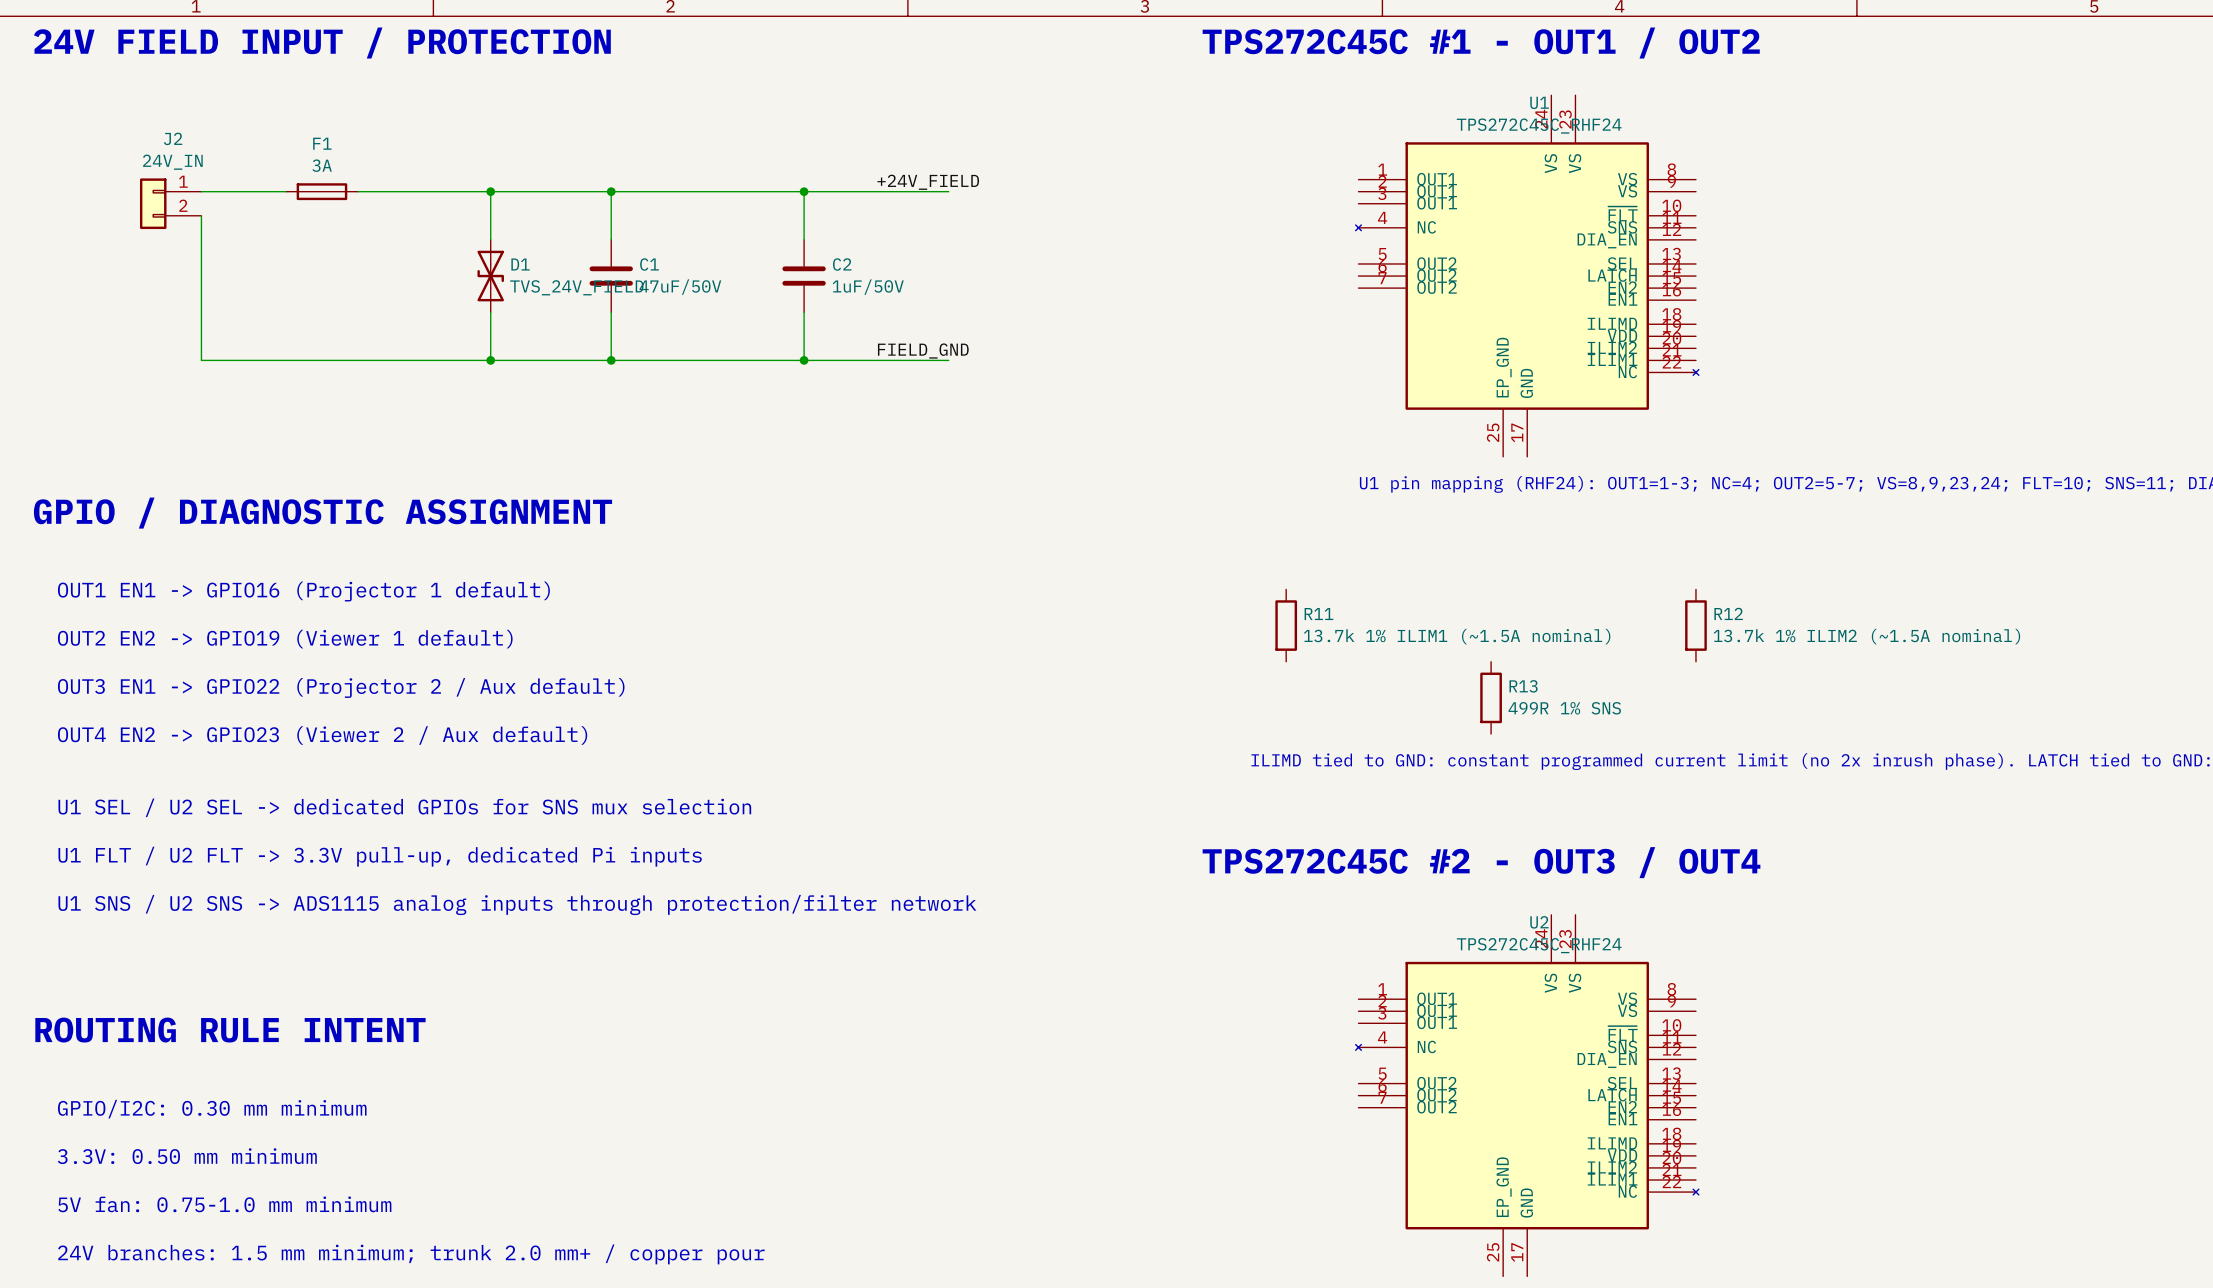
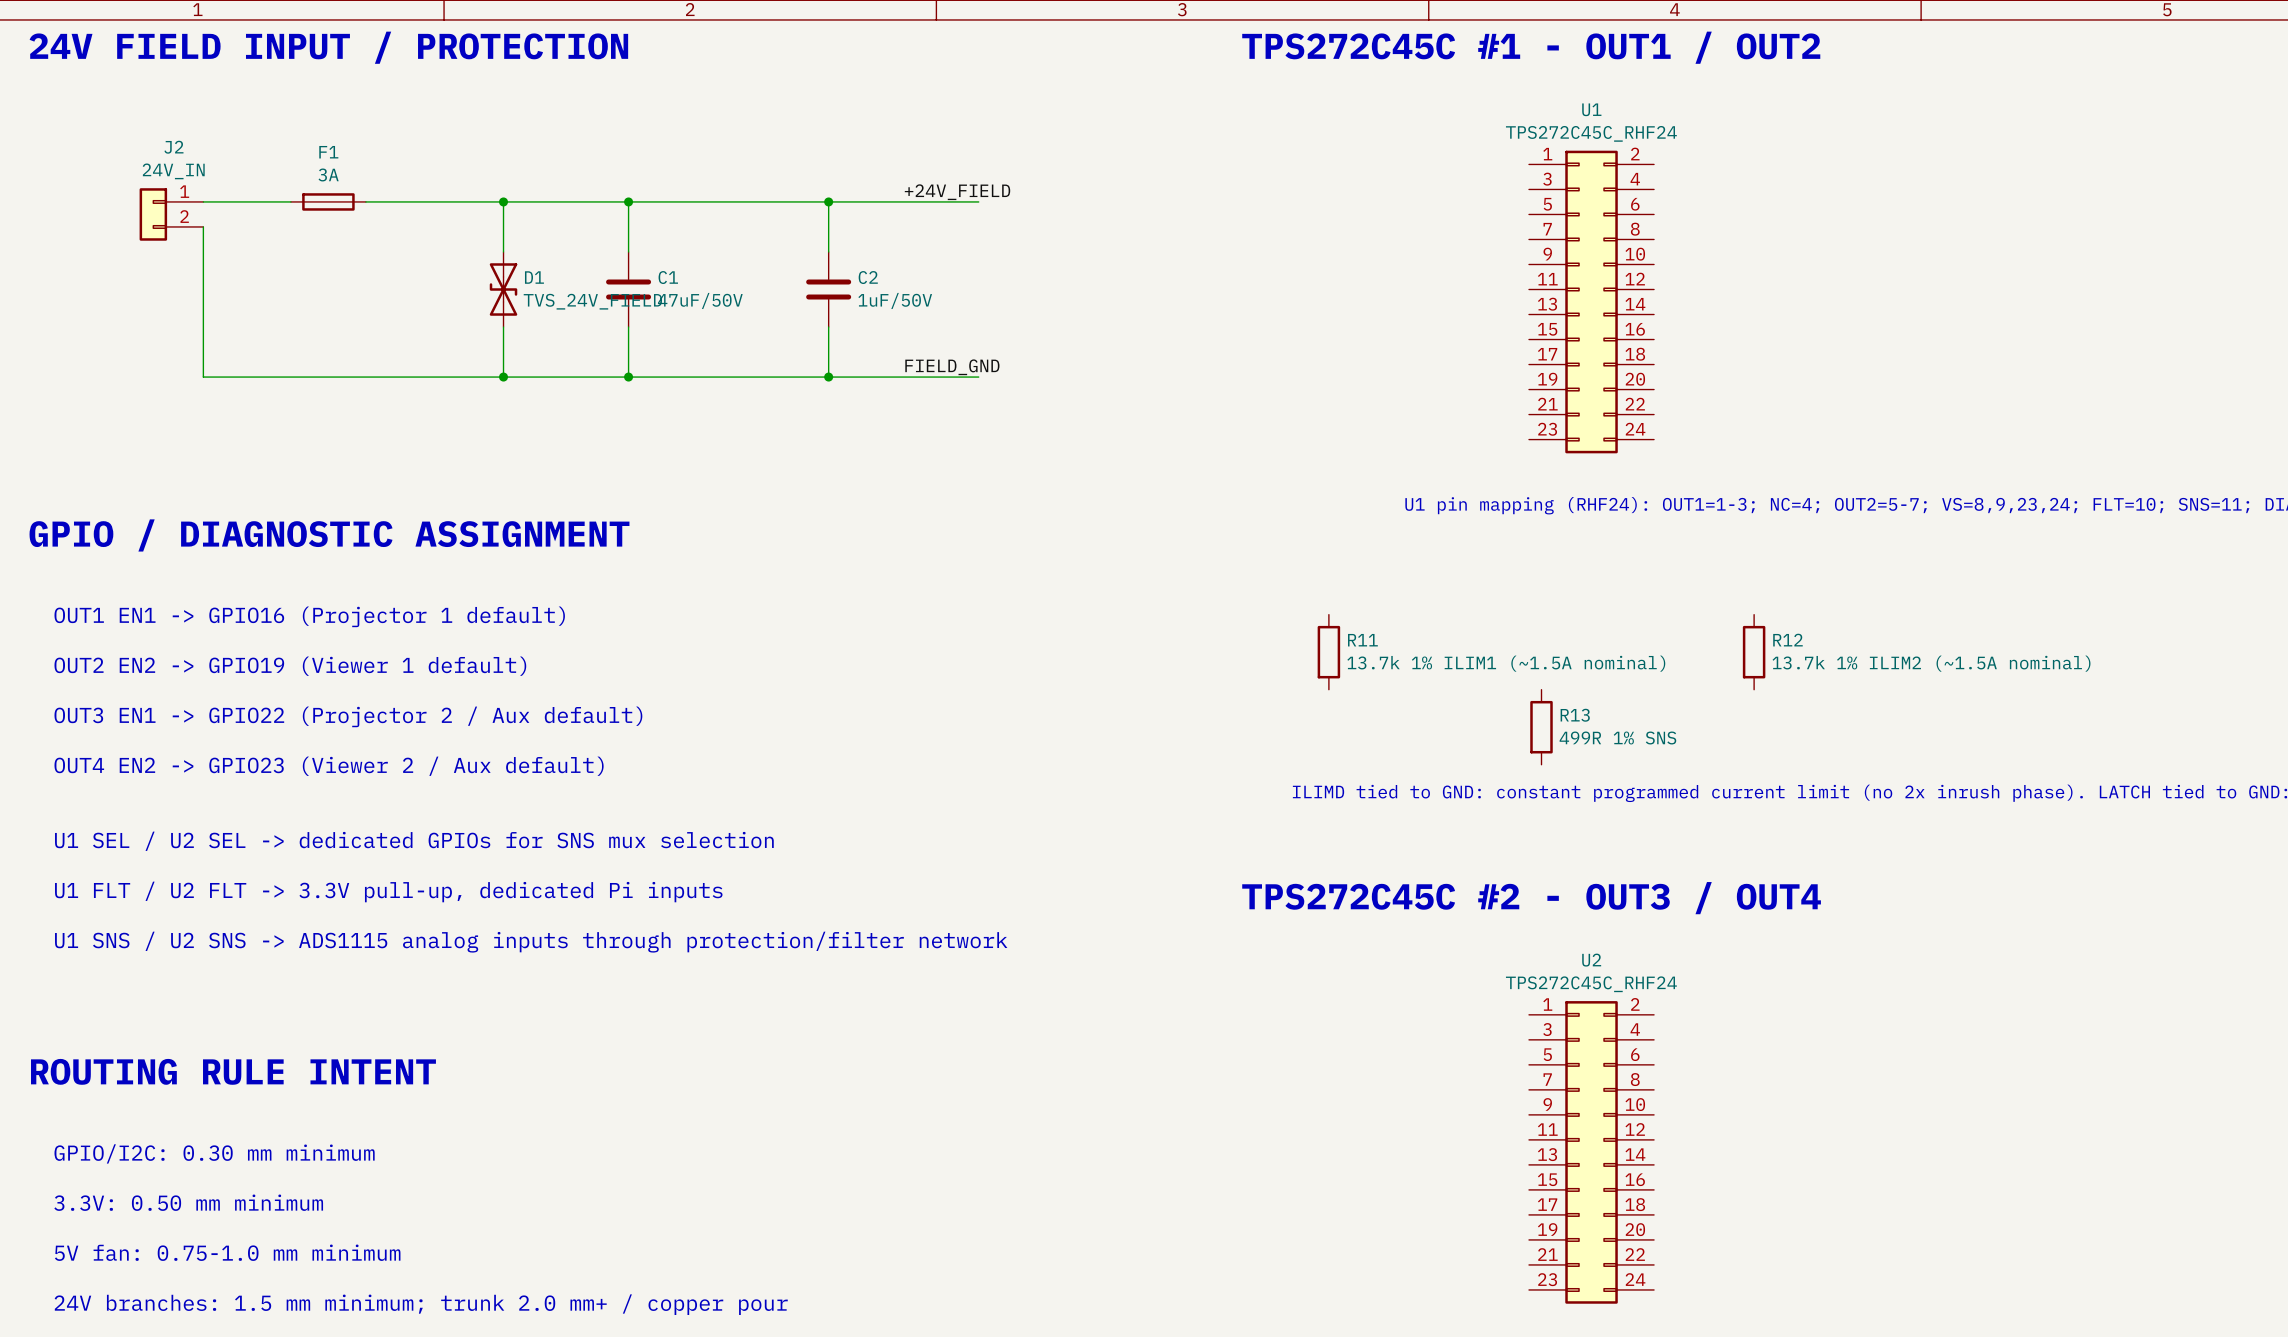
U1 symbol: [1355, 95, 1699, 457] -> [1528, 150, 1655, 454]
U2 symbol: [1355, 914, 1699, 1277] -> [1528, 1001, 1655, 1304]

